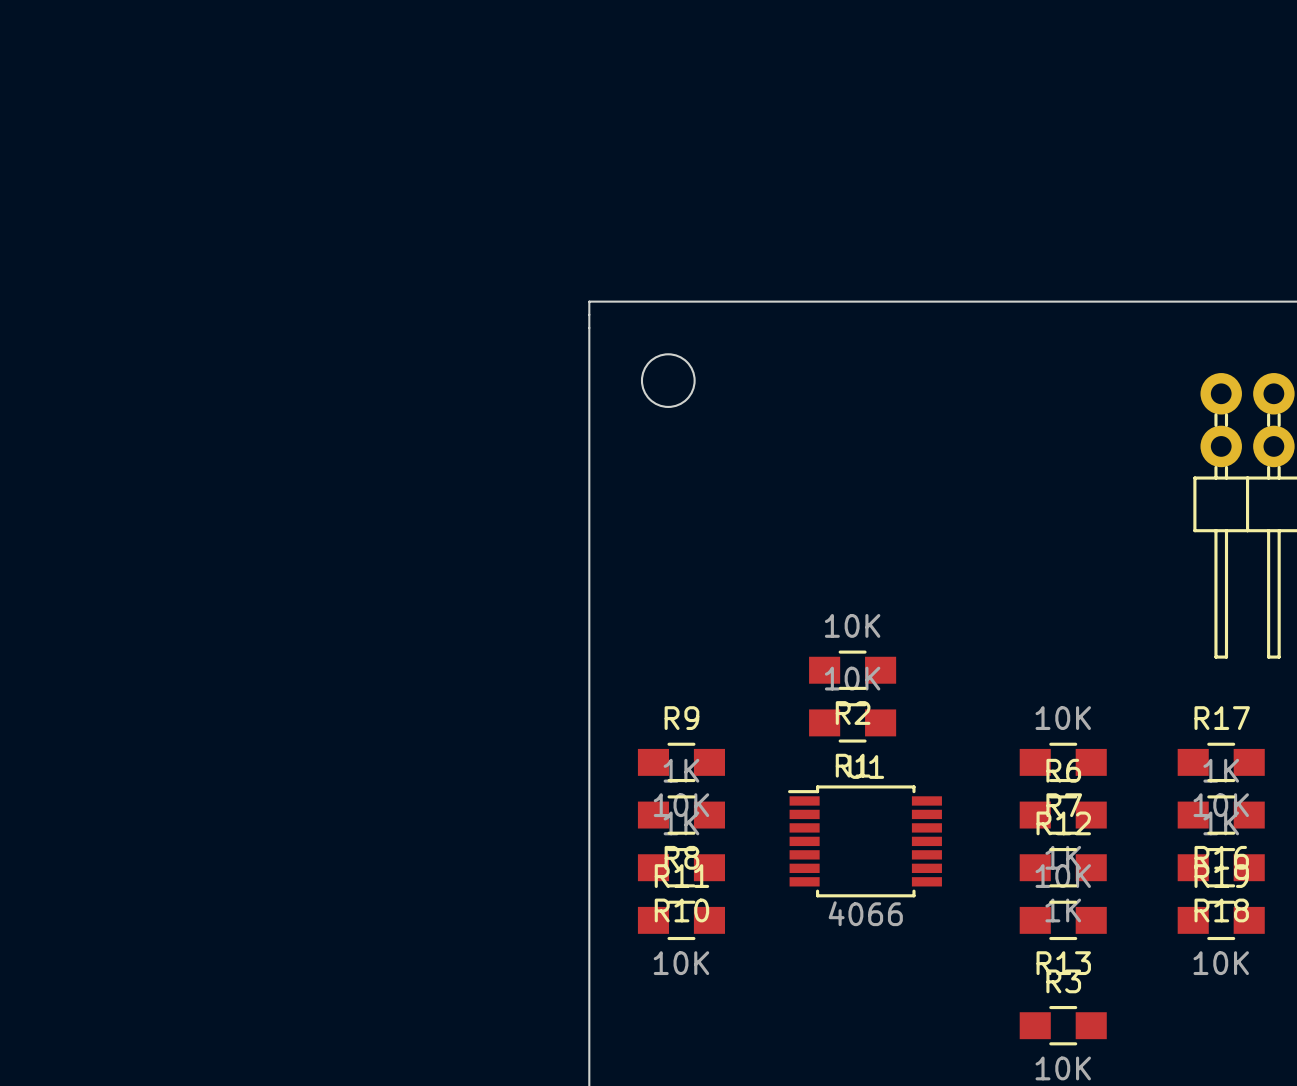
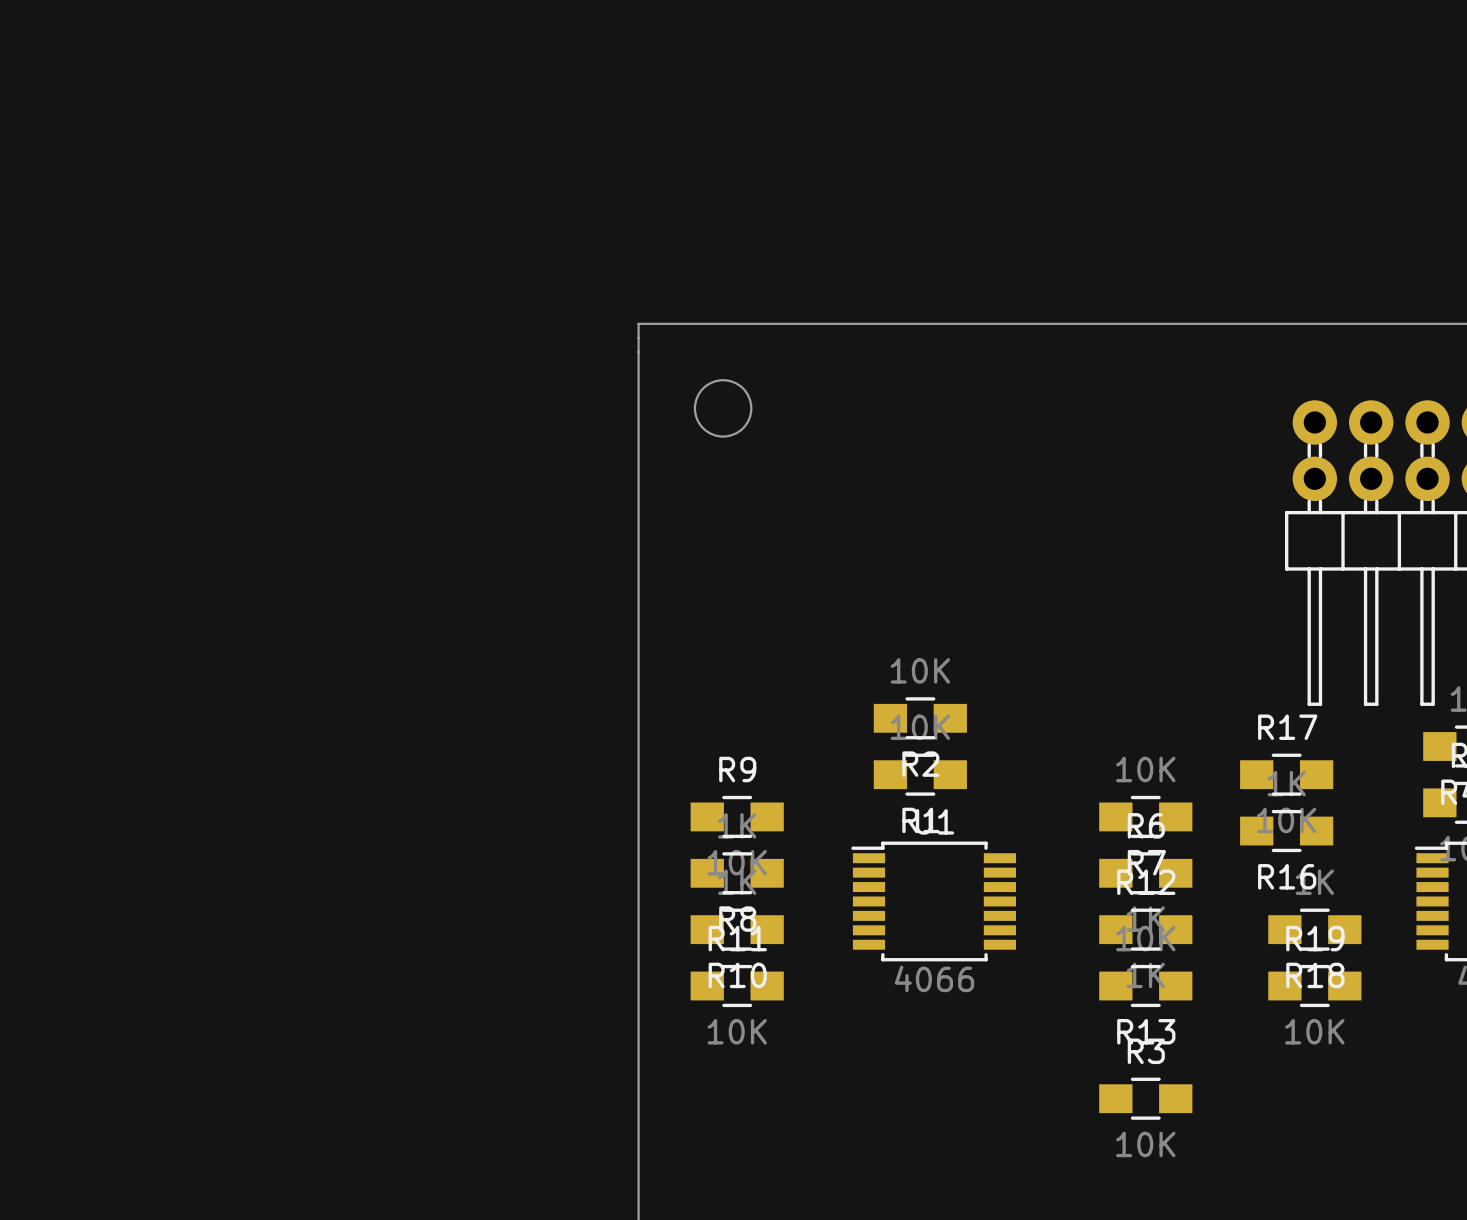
R17 position: (1221, 762) -> (1286, 774)
R16 position: (1221, 815) -> (1286, 831)

